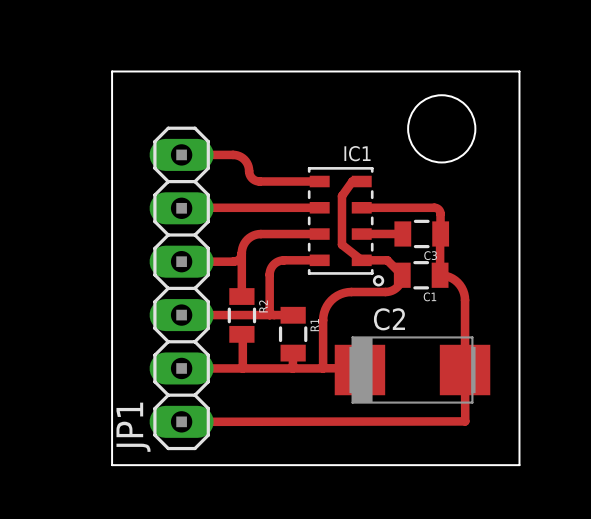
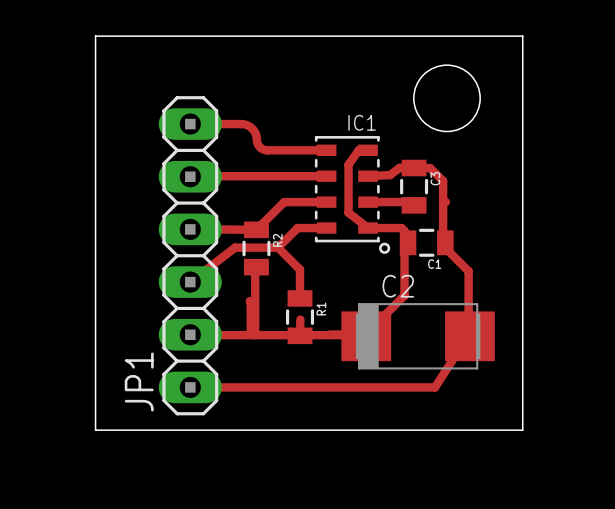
top track: (361, 207) (434, 207) (440, 211) (440, 275) (455, 280) (461, 287) (464, 296) (465, 421) (181, 421) -> (368, 176) (390, 175) (399, 167) (430, 168) (443, 181) (443, 245) (468, 271) (468, 335) (435, 387) (190, 387)
C3 rotation: 0° (421, 233) -> 90° clockwise (414, 186)
top track: (276, 234) (258, 234) (251, 236) (244, 243) (241, 253) -> (284, 202) (256, 229) (211, 229)
top track: (241, 253) (241, 296) -> none
top track: (241, 253) (240, 258) (235, 261) (203, 261) -> none
top track: (290, 260) (278, 261) (270, 269) (269, 315) -> (297, 228) (278, 247)
top track: (387, 260) (402, 275) (400, 283) (395, 288) (387, 291) (344, 292) (334, 297) (326, 306) (323, 320) (323, 368) (181, 368) -> (393, 228) (401, 228) (404, 231) (404, 295) (364, 335) (190, 334)
top track: none -> (278, 247) (300, 269) (300, 298)
top track: none -> (256, 267) (255, 335)
top track: (181, 315) (293, 315) -> (190, 282) (235, 247) (278, 247)
R2 position: (241, 315) -> (256, 248)
R1 position: (293, 334) -> (300, 317)
board edge: (112, 465) (112, 71) (519, 71) (518, 465) -> (121, 430) (95, 430) (95, 36) (522, 36) (522, 430)

